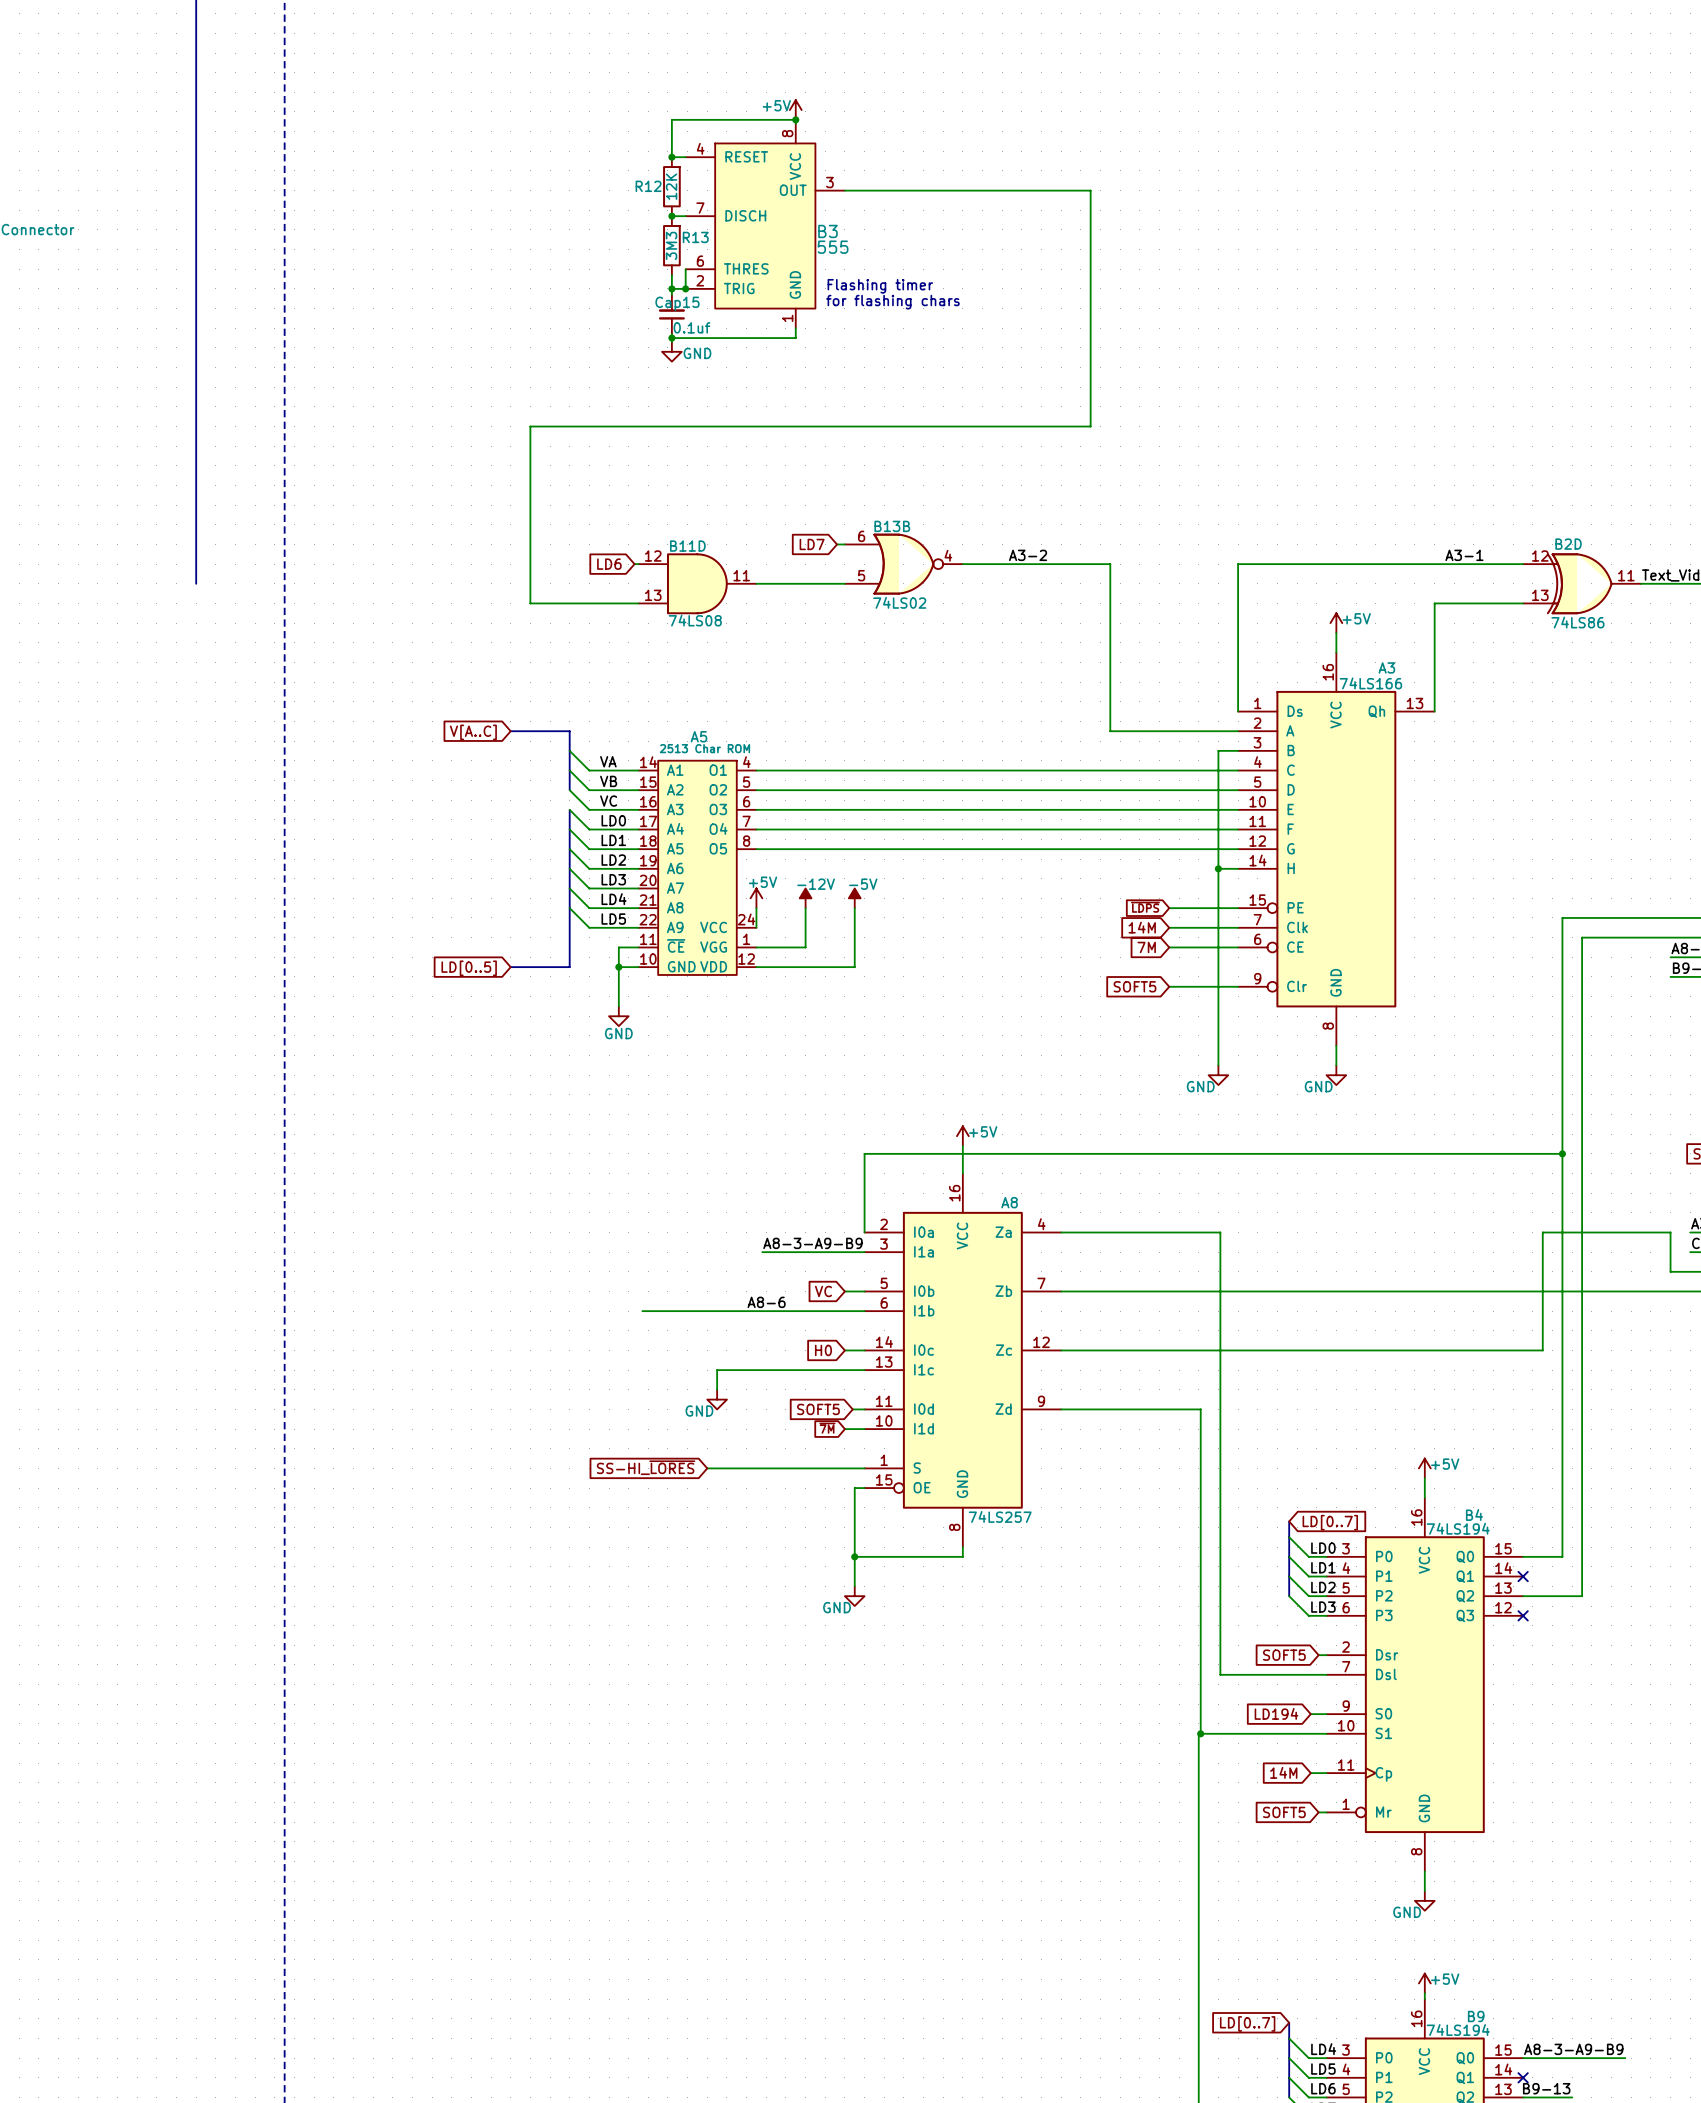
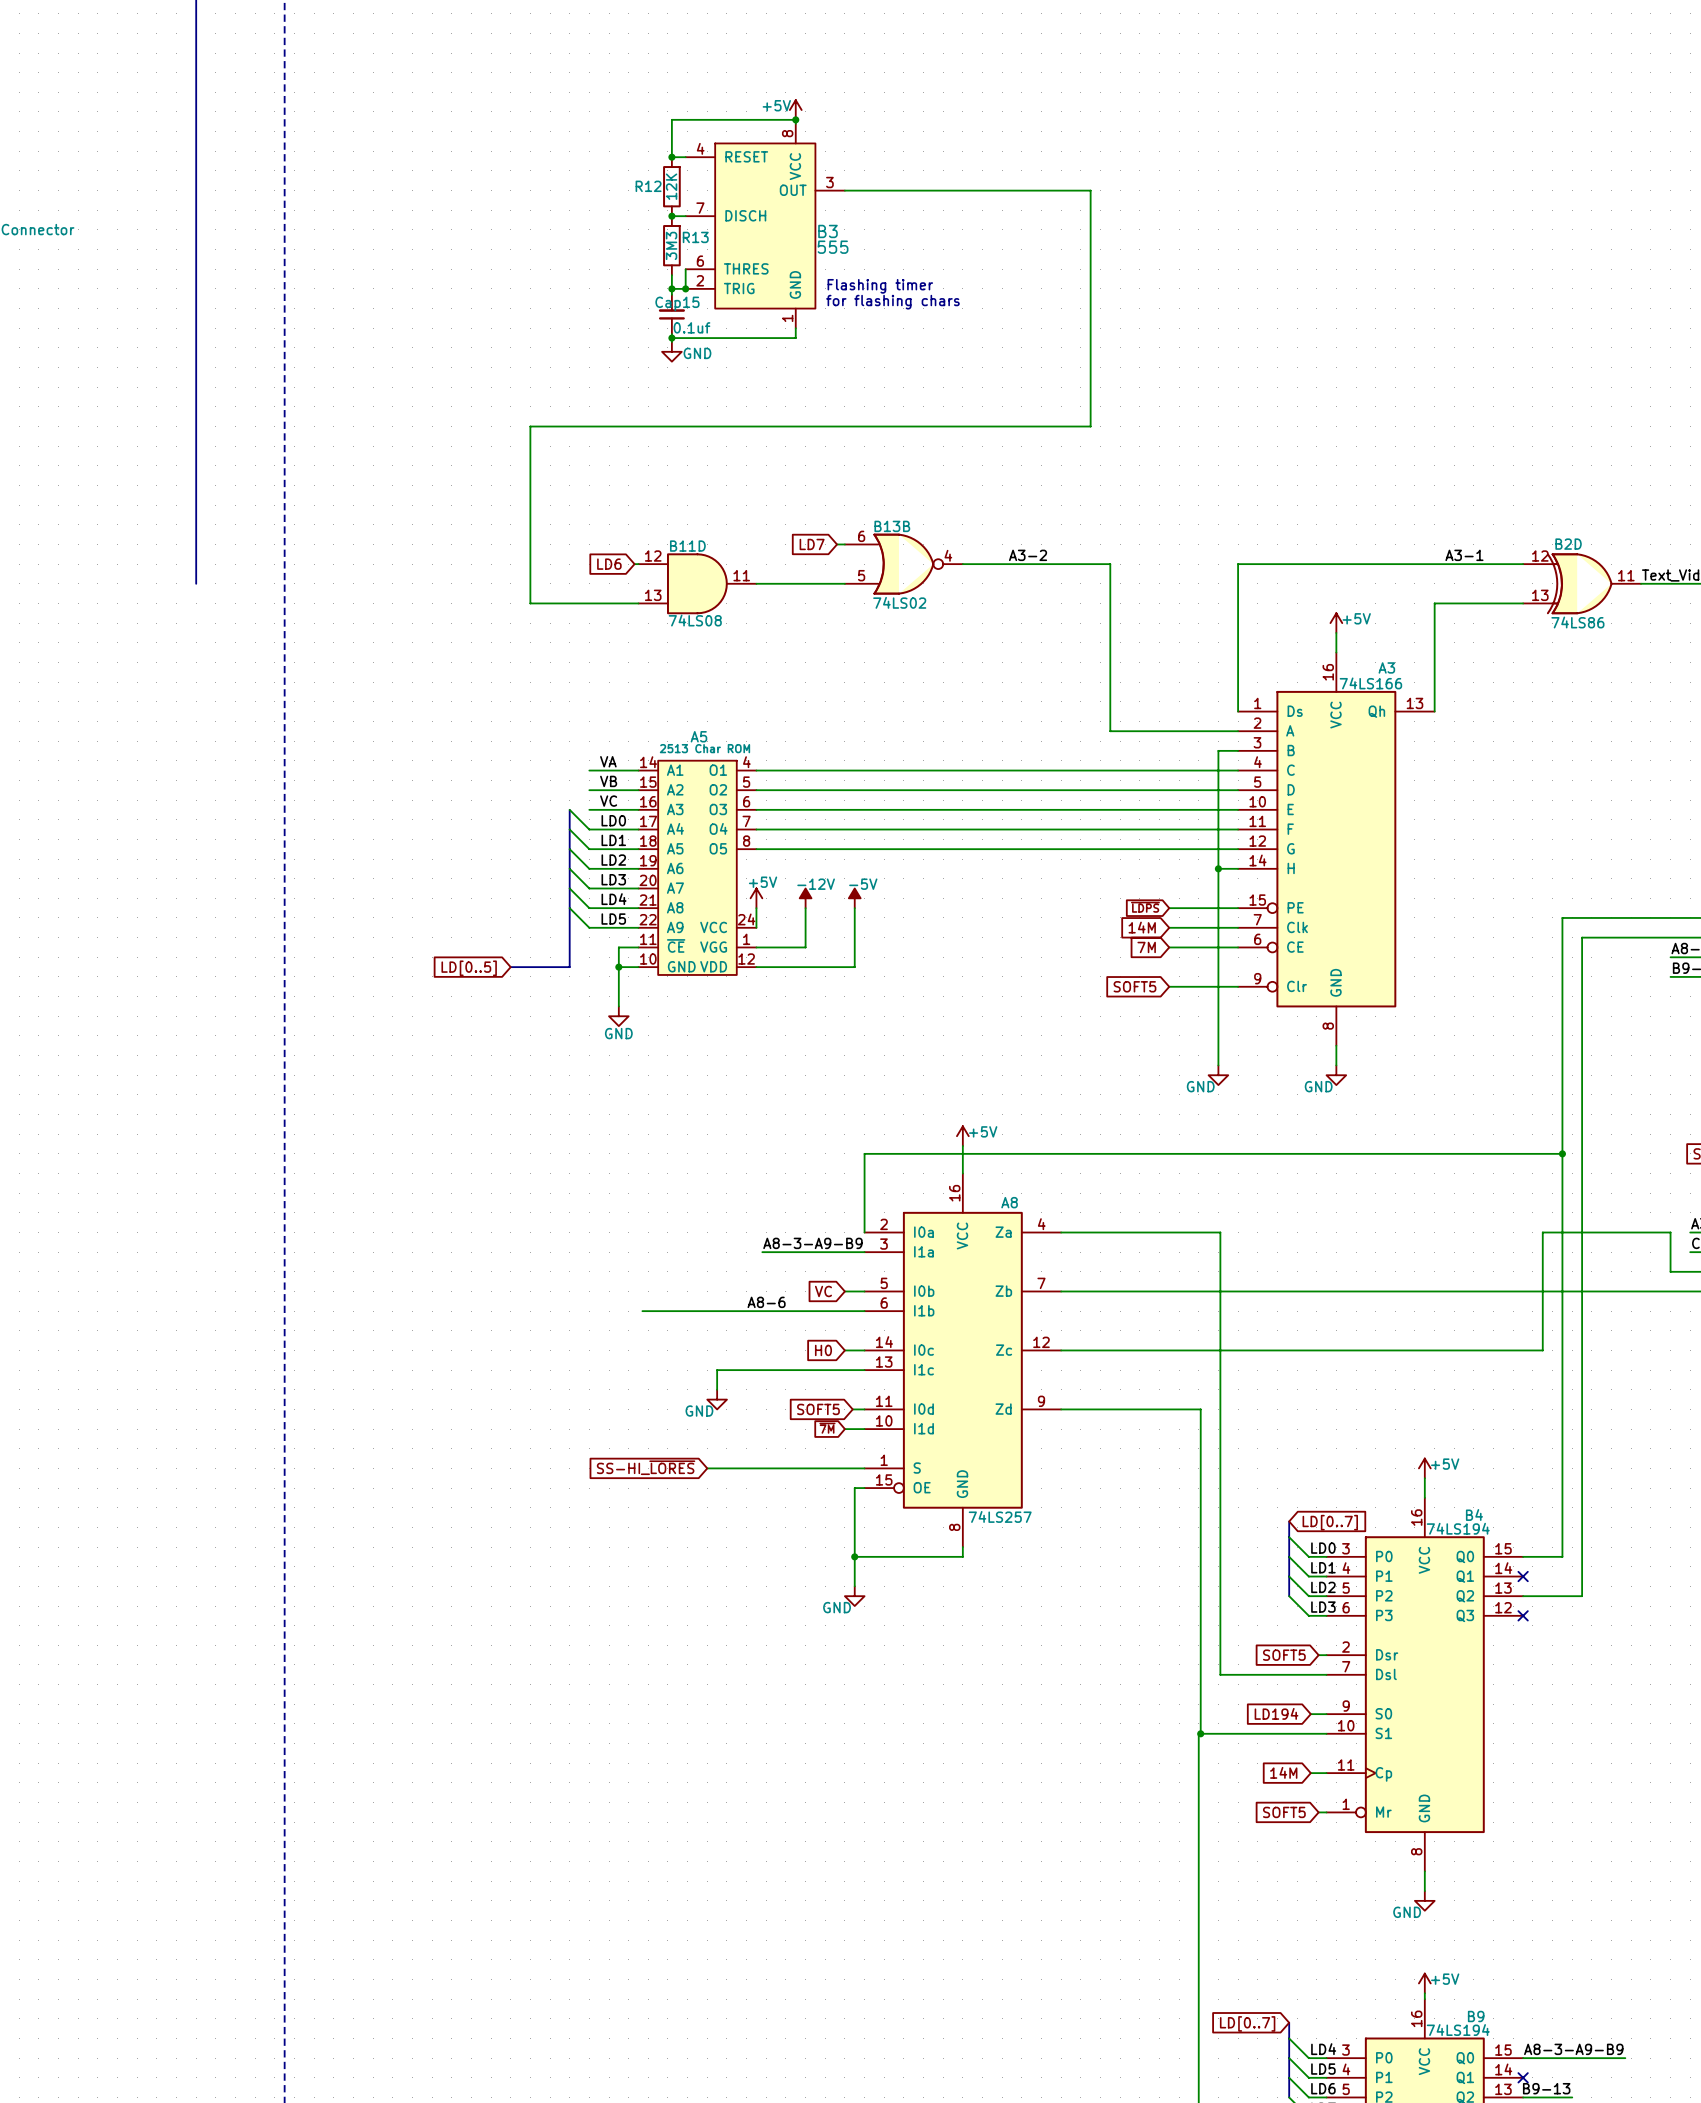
bus: (510, 731) (569, 731) (569, 790) -> none
global label: V[A..C] (473, 732) -> none
wire: (569, 750) (589, 770) -> none
wire: (569, 770) (589, 790) -> none
wire: (569, 790) (589, 809) -> none

